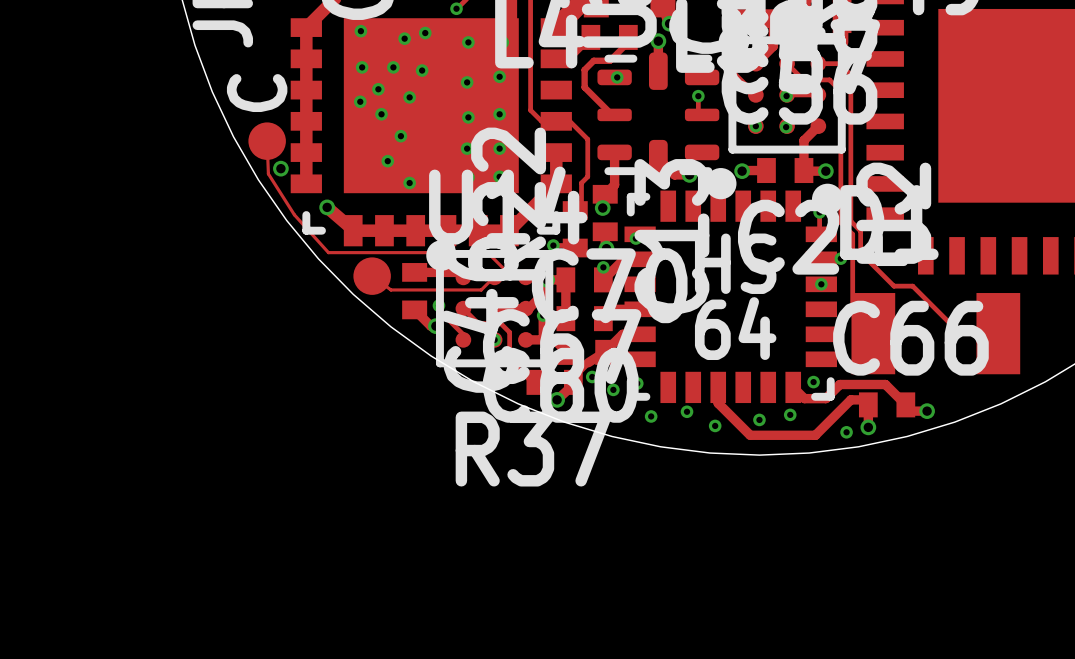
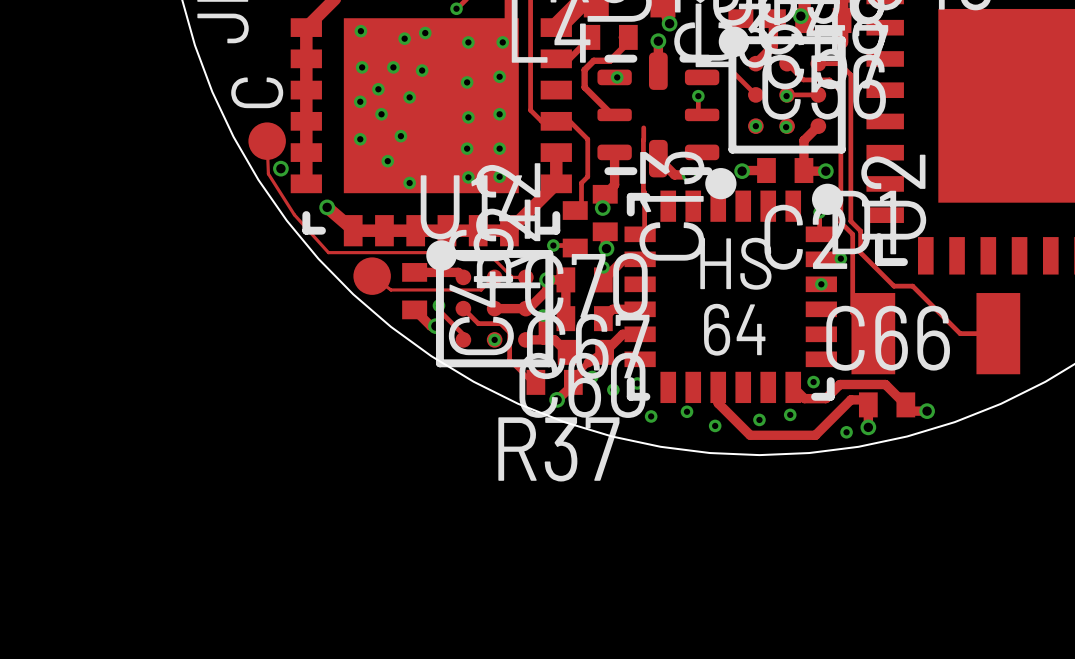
track: none -> (643, 127) (643, 140)
track: none -> (643, 140) (644, 229)
via position: (635, 238) -> (360, 139)

